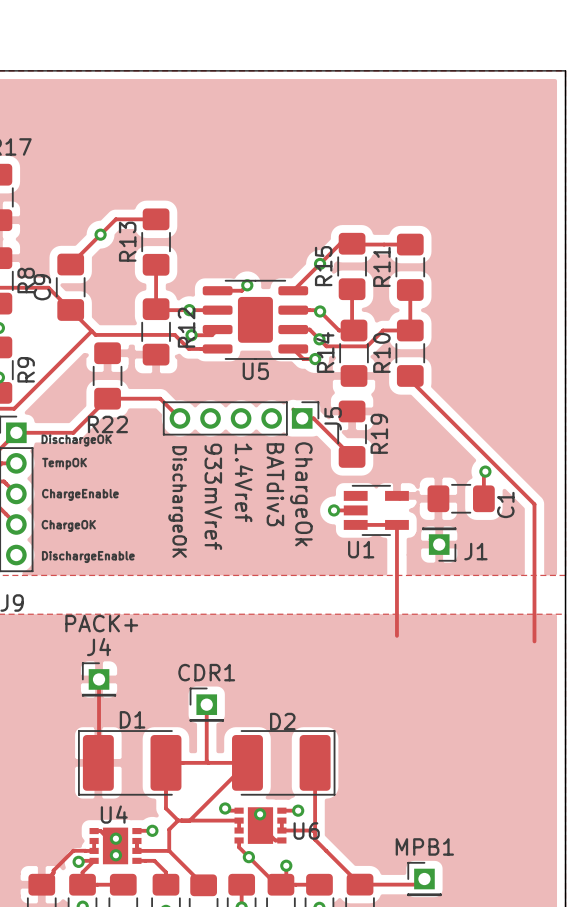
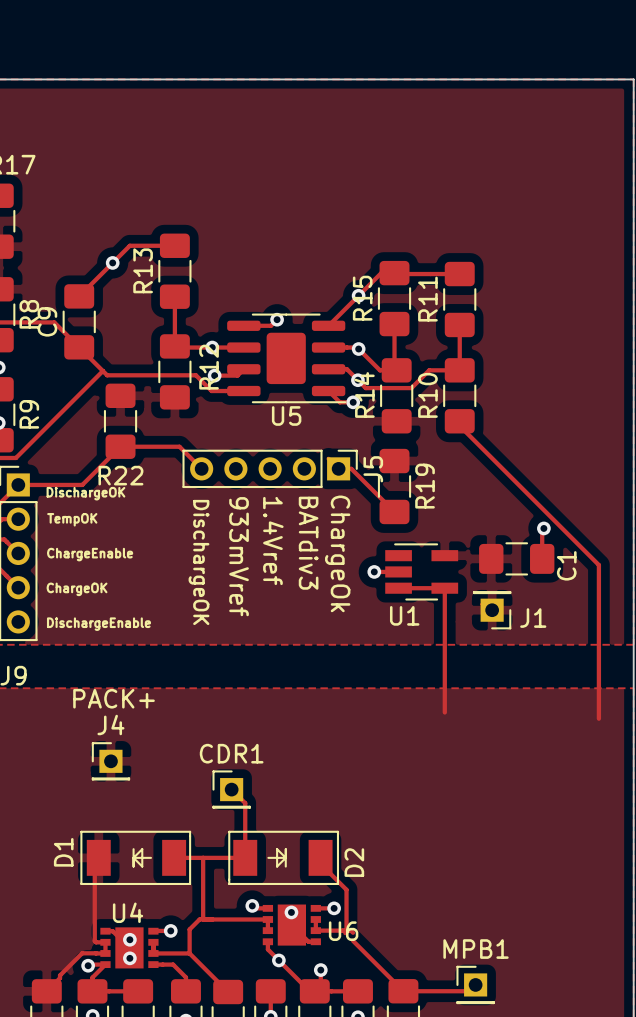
track: (99, 679) (98, 762) -> none
track: (206, 704) (206, 760) (208, 762) -> (231, 789) (245, 803) (245, 857) (174, 857)
D1 name position: D1 (132, 719) -> D1 (63, 852)
D2 name position: D2 (282, 721) -> D2 (354, 862)
D1 footprint: [78, 730, 182, 796] -> [80, 830, 192, 885]
D2 footprint: [232, 730, 336, 796] -> [228, 830, 340, 885]
track: (315, 762) (315, 839) -> none
track: none -> (98, 857) (98, 863) (94, 867) (94, 941) (105, 942)
track: none -> (203, 857) (203, 919)
track: none -> (320, 857) (320, 863) (346, 889) (345, 933)
track: (178, 820) (165, 808) (165, 762) (247, 762) (189, 820) -> none

